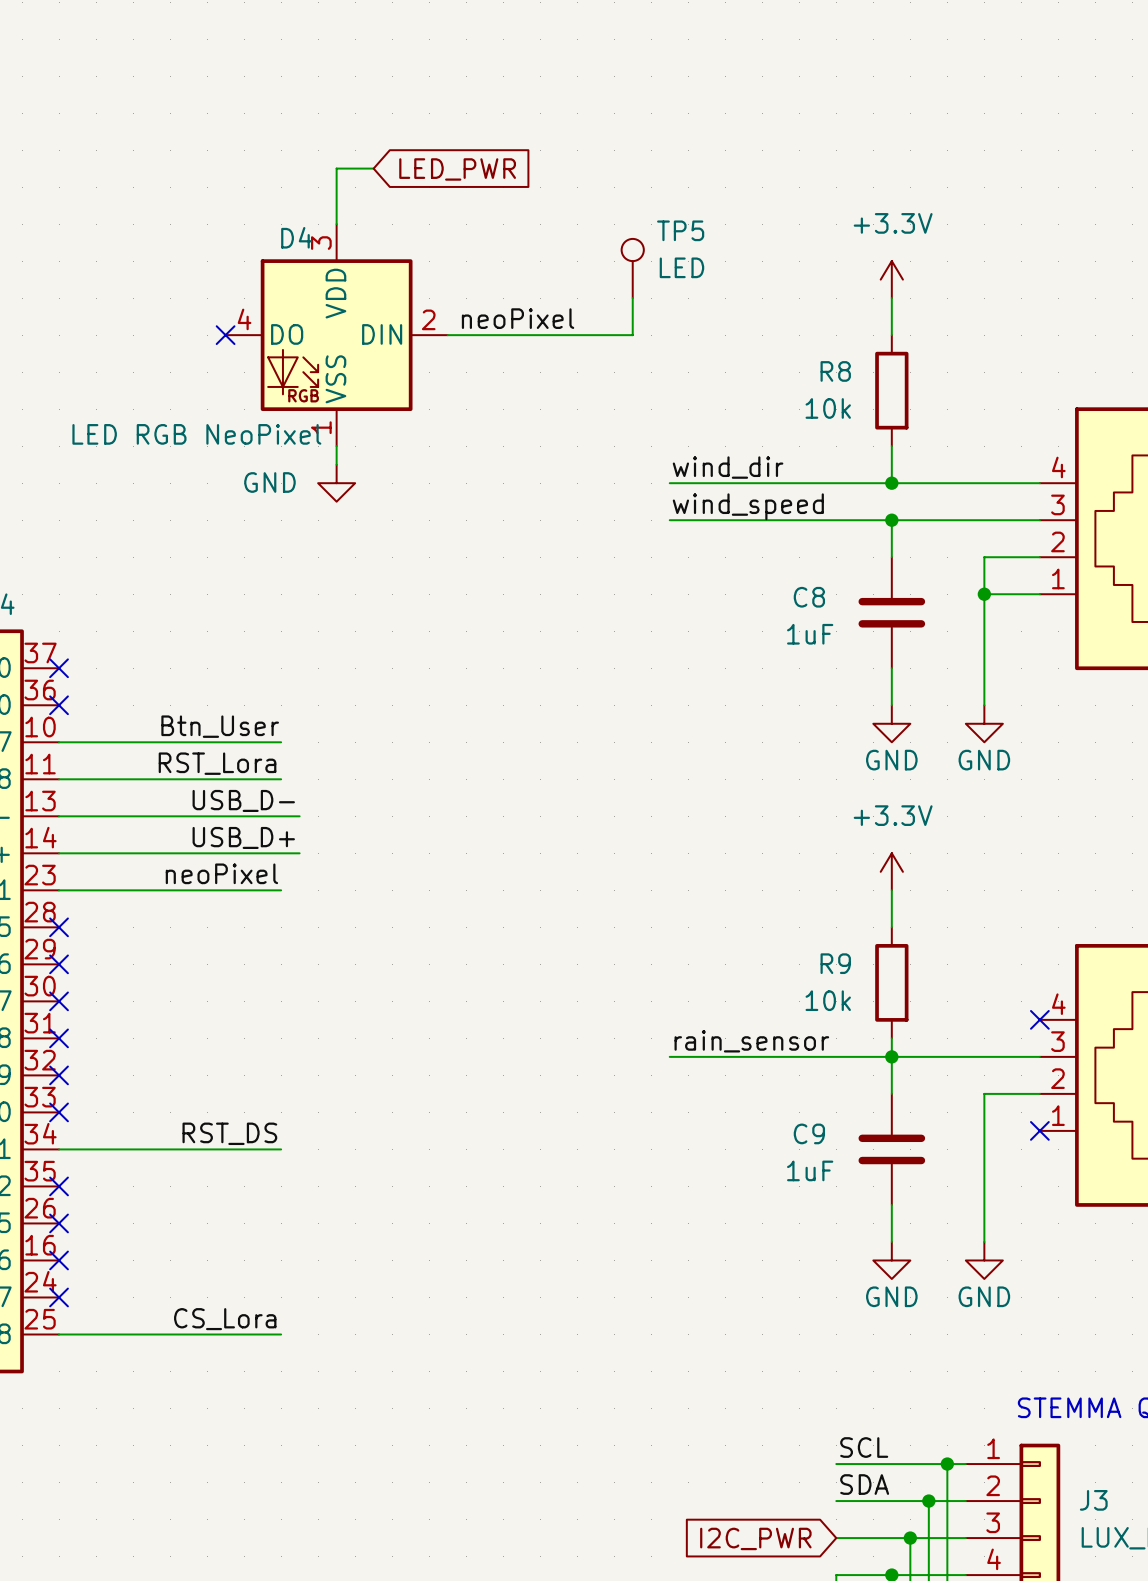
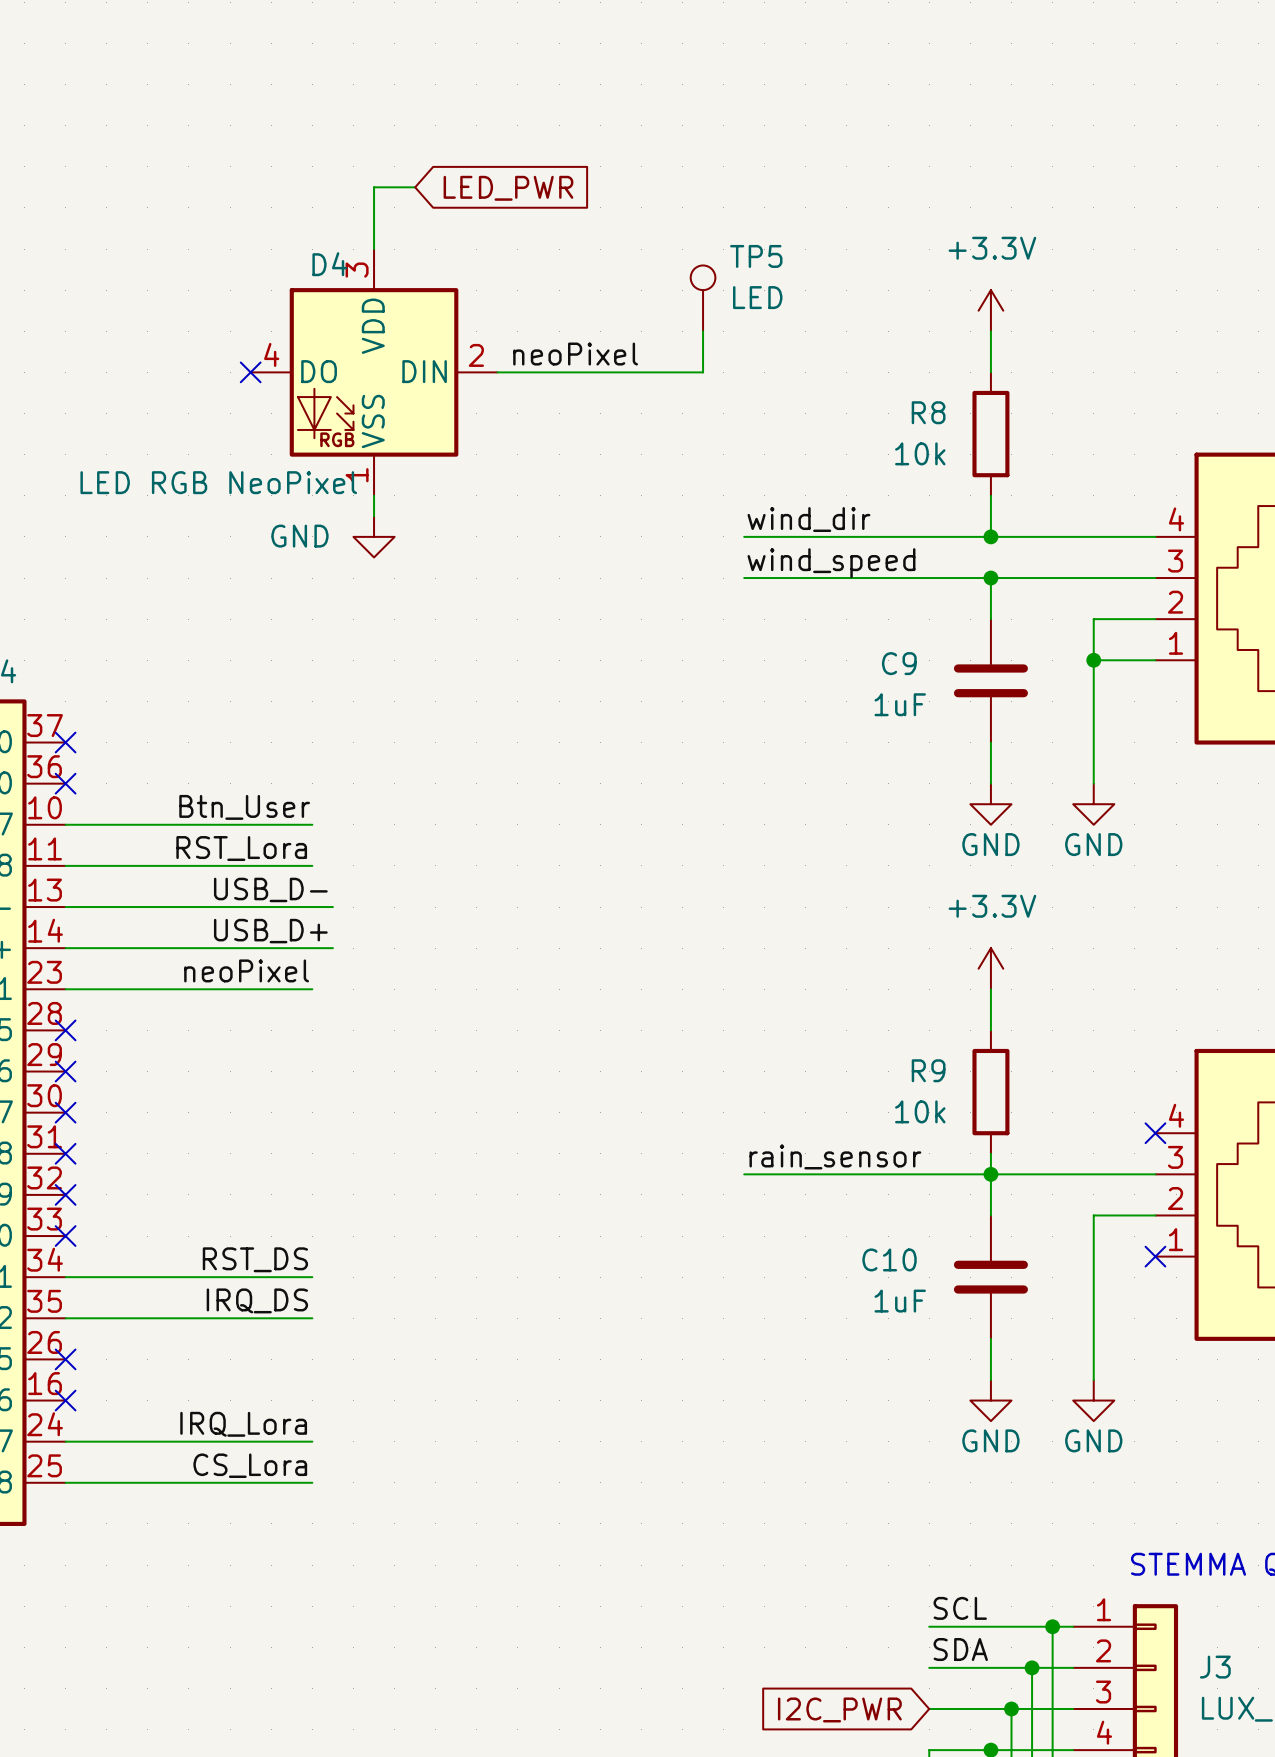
C8 name: C8 (809, 597) -> C9 (899, 663)
C9 name: C9 (809, 1133) -> C10 (889, 1259)
label: none -> IRQ_DS (257, 1300)
wire: none -> (65, 1318) (312, 1318)
no-connect mark: (59, 1186) -> none
label: none -> IRQ_Lora (243, 1424)
wire: none -> (65, 1441) (312, 1441)
no-connect mark: (59, 1297) -> none

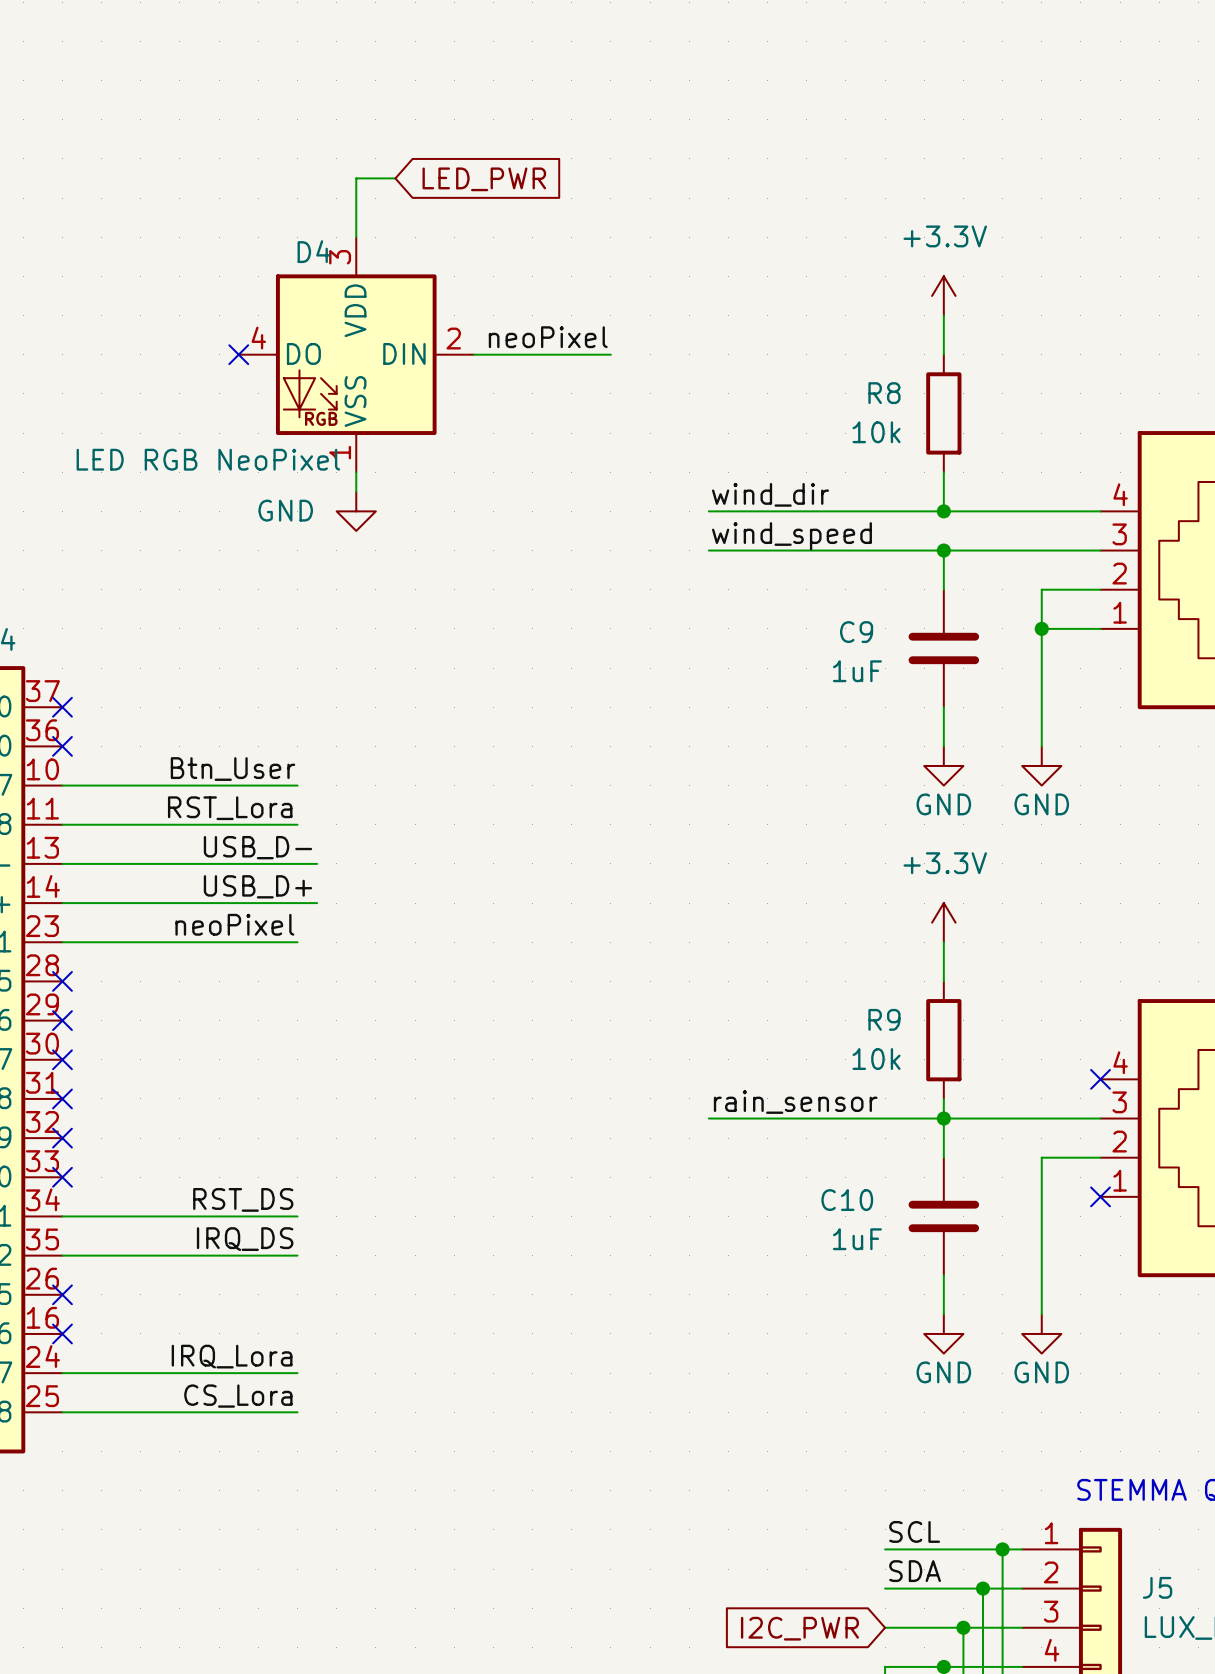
TP5: LED (703, 298) -> none
wire: (703, 331) (703, 372) (641, 372) -> none
J3 name: J3 (1215, 1667) -> J5 (1157, 1587)

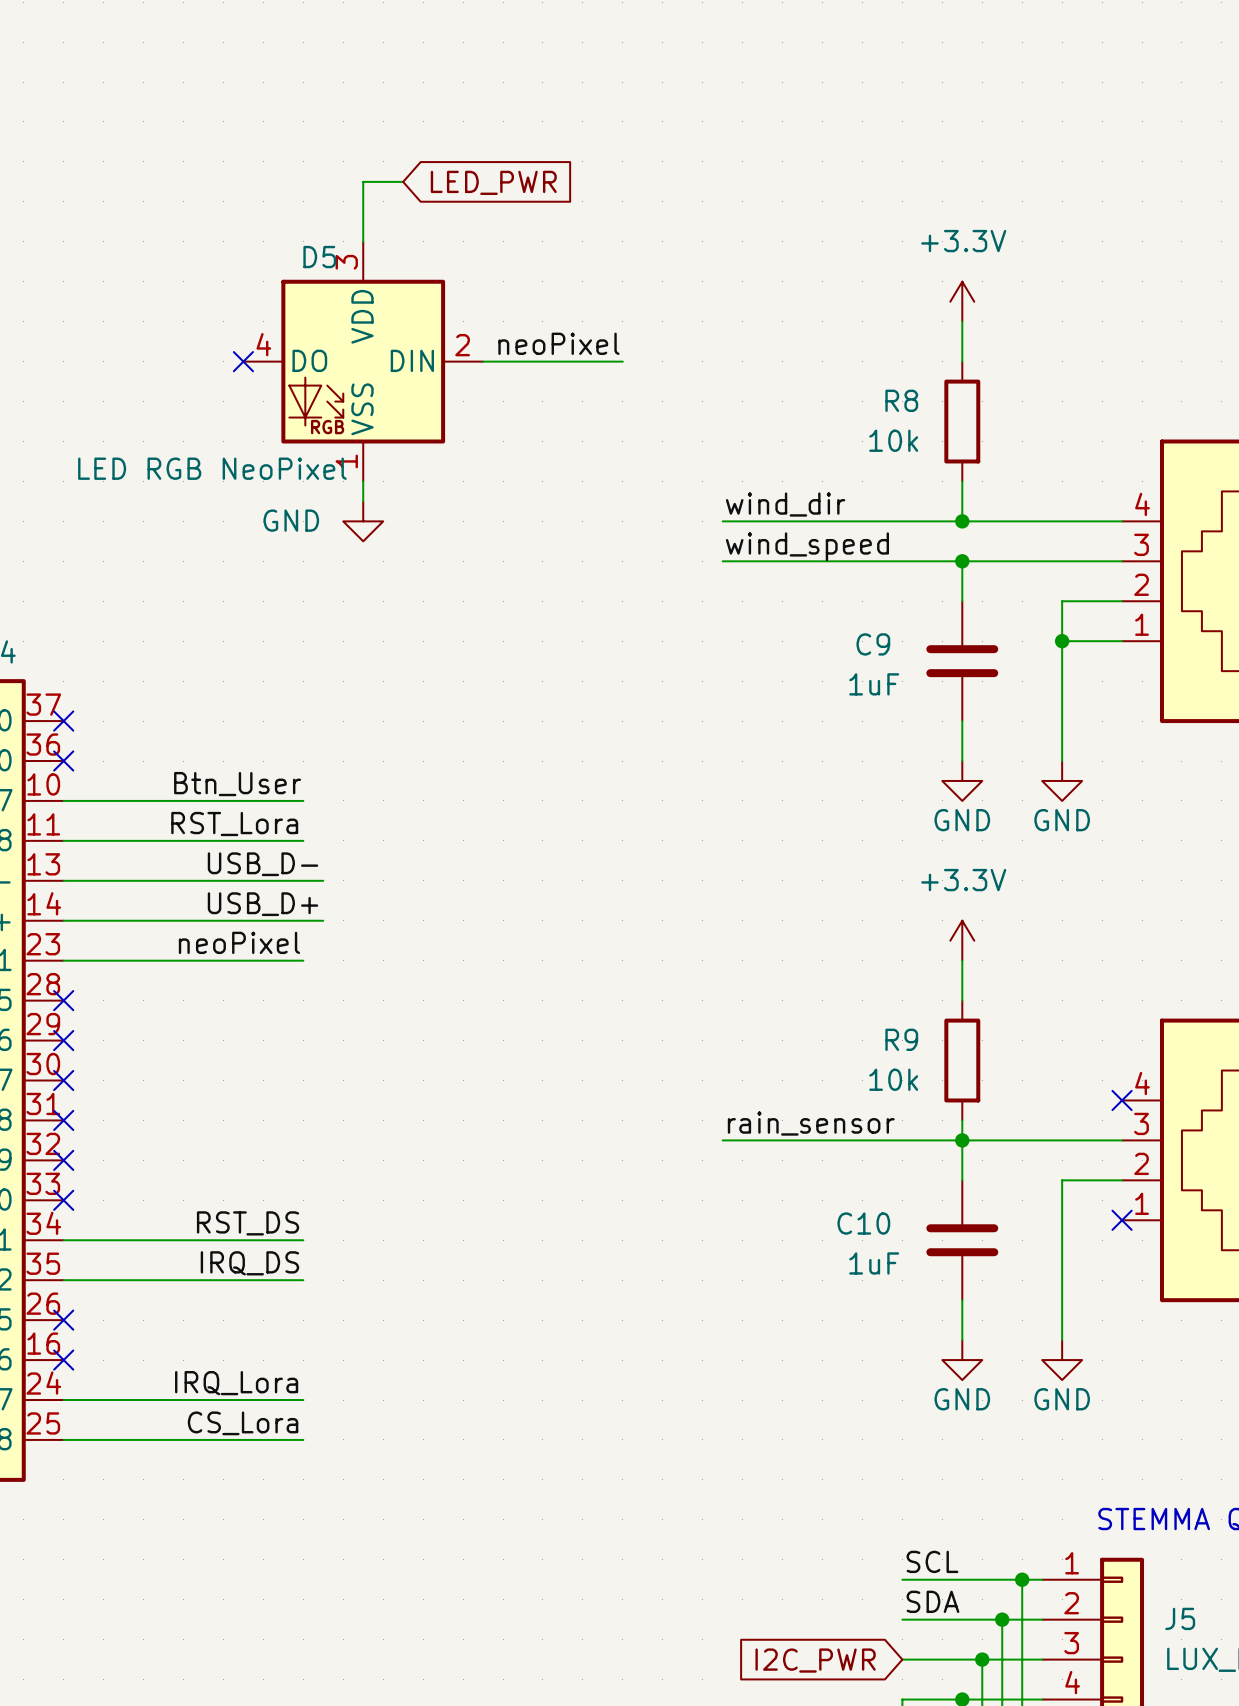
D4 name: D4 (314, 251) -> D5 (319, 257)

